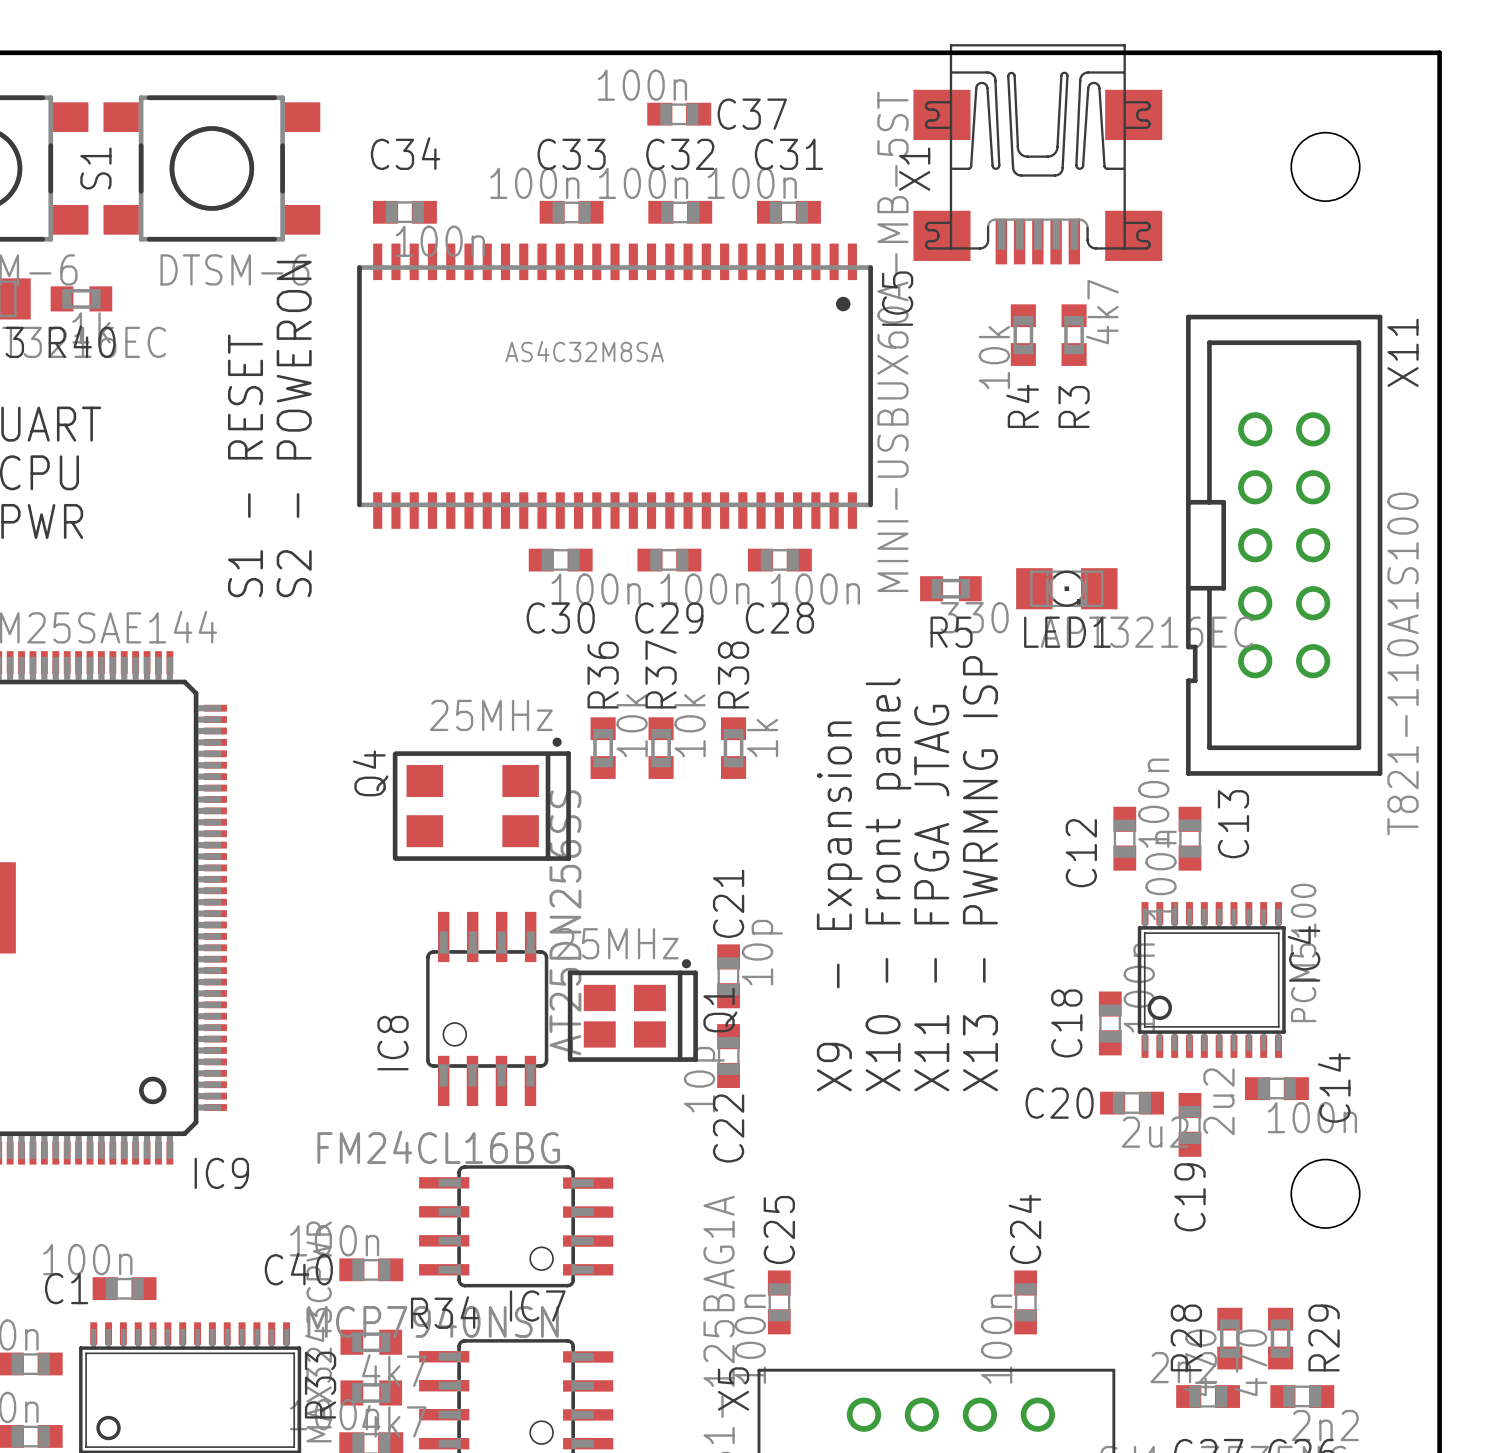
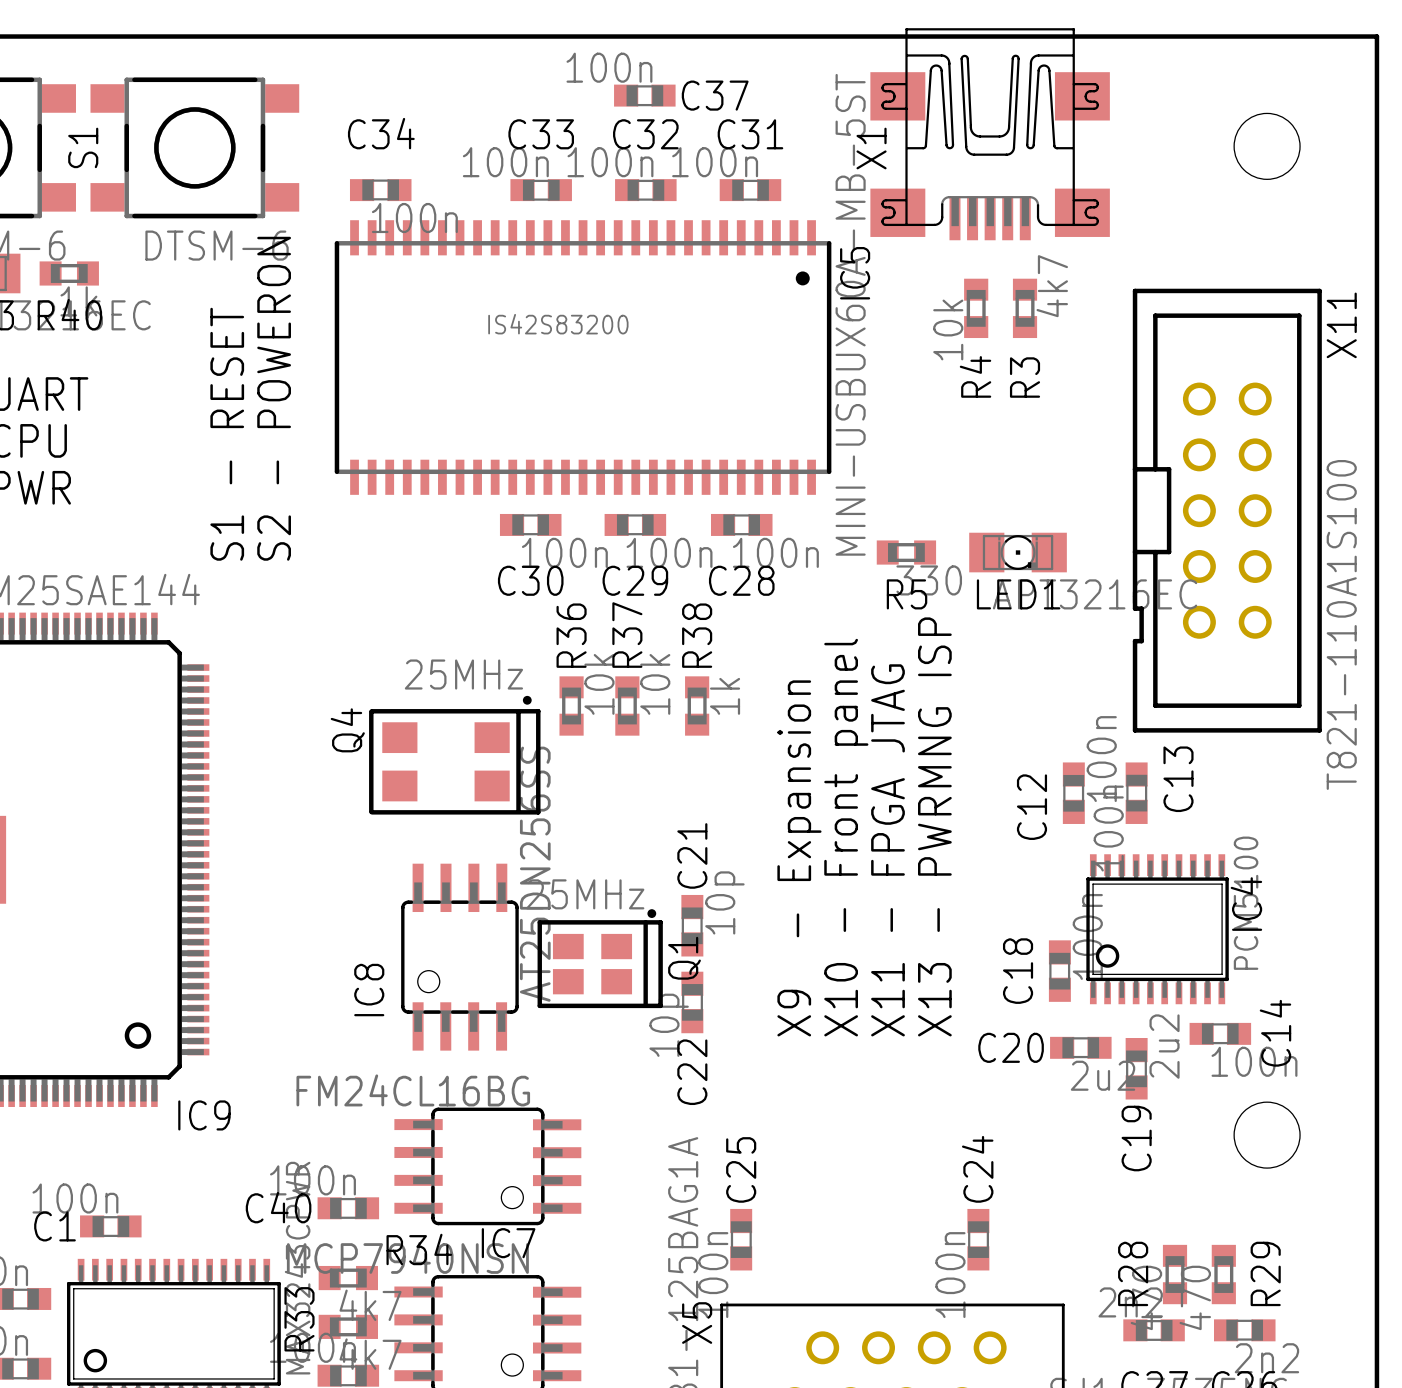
IC5 value: AS4C32M8SA (584, 351) -> IS42S83200 (558, 324)

